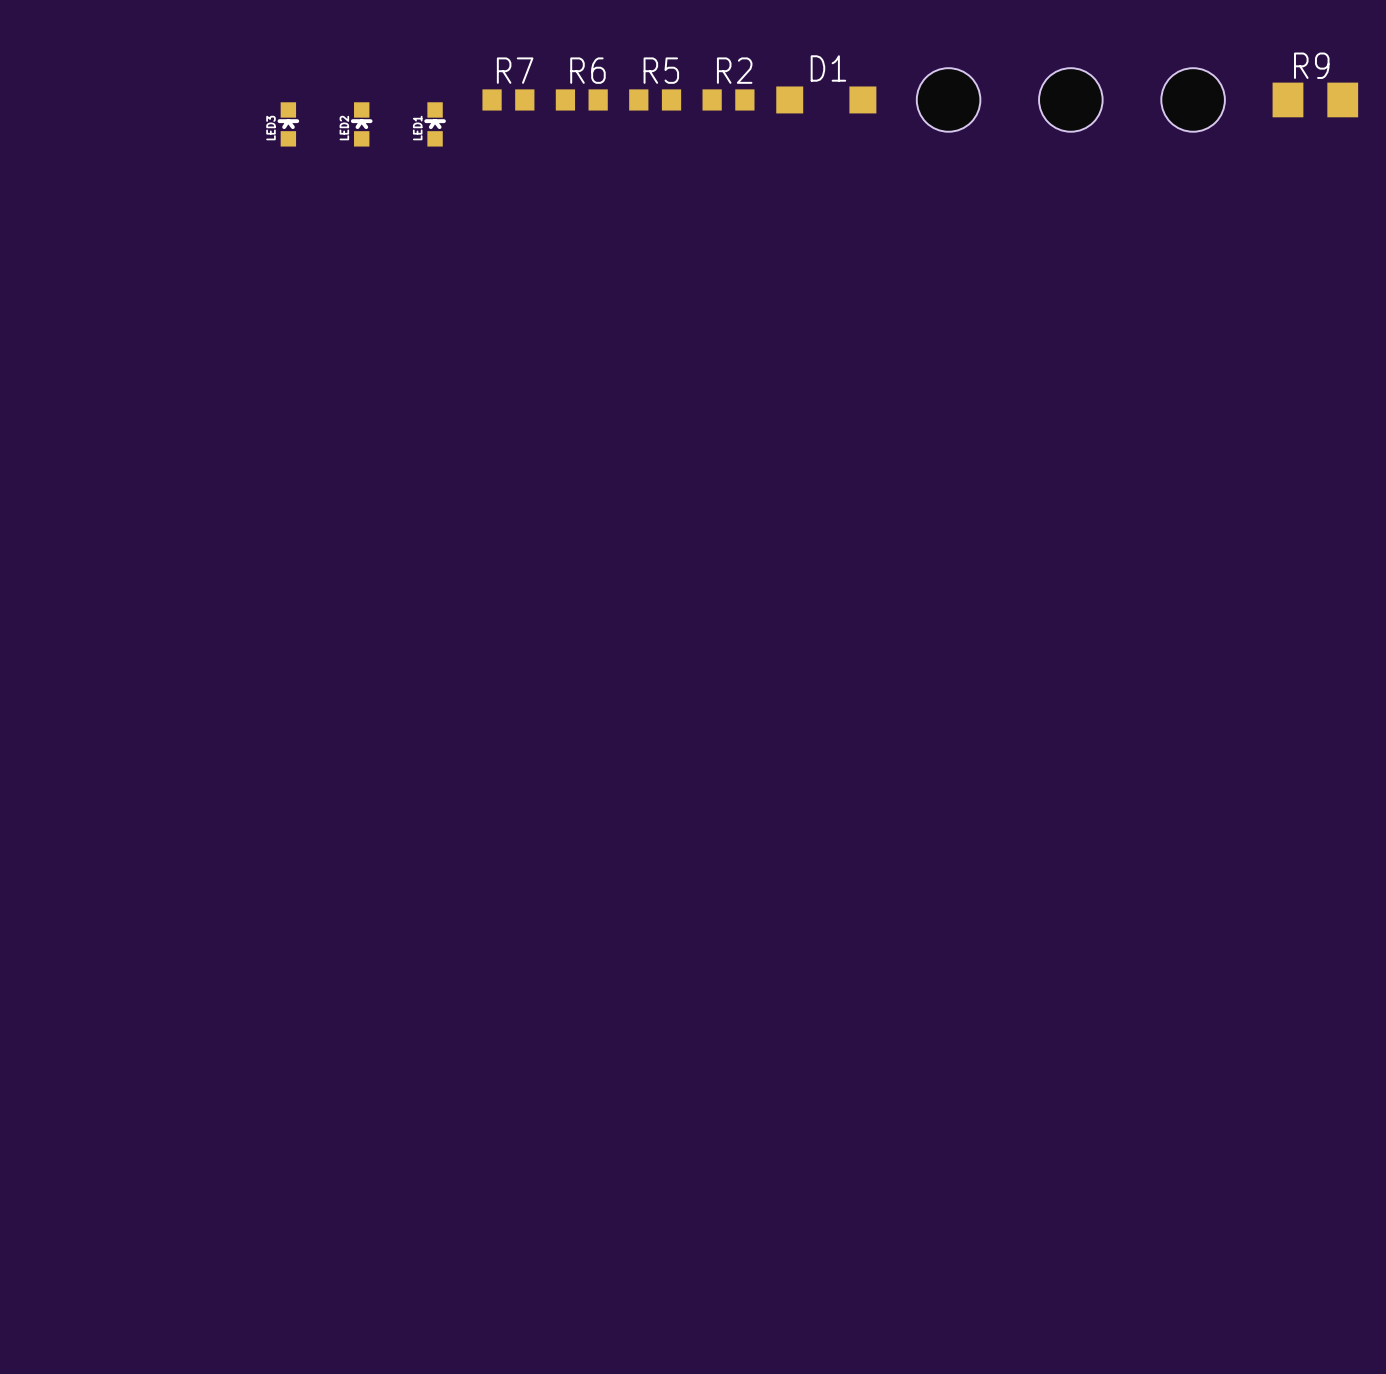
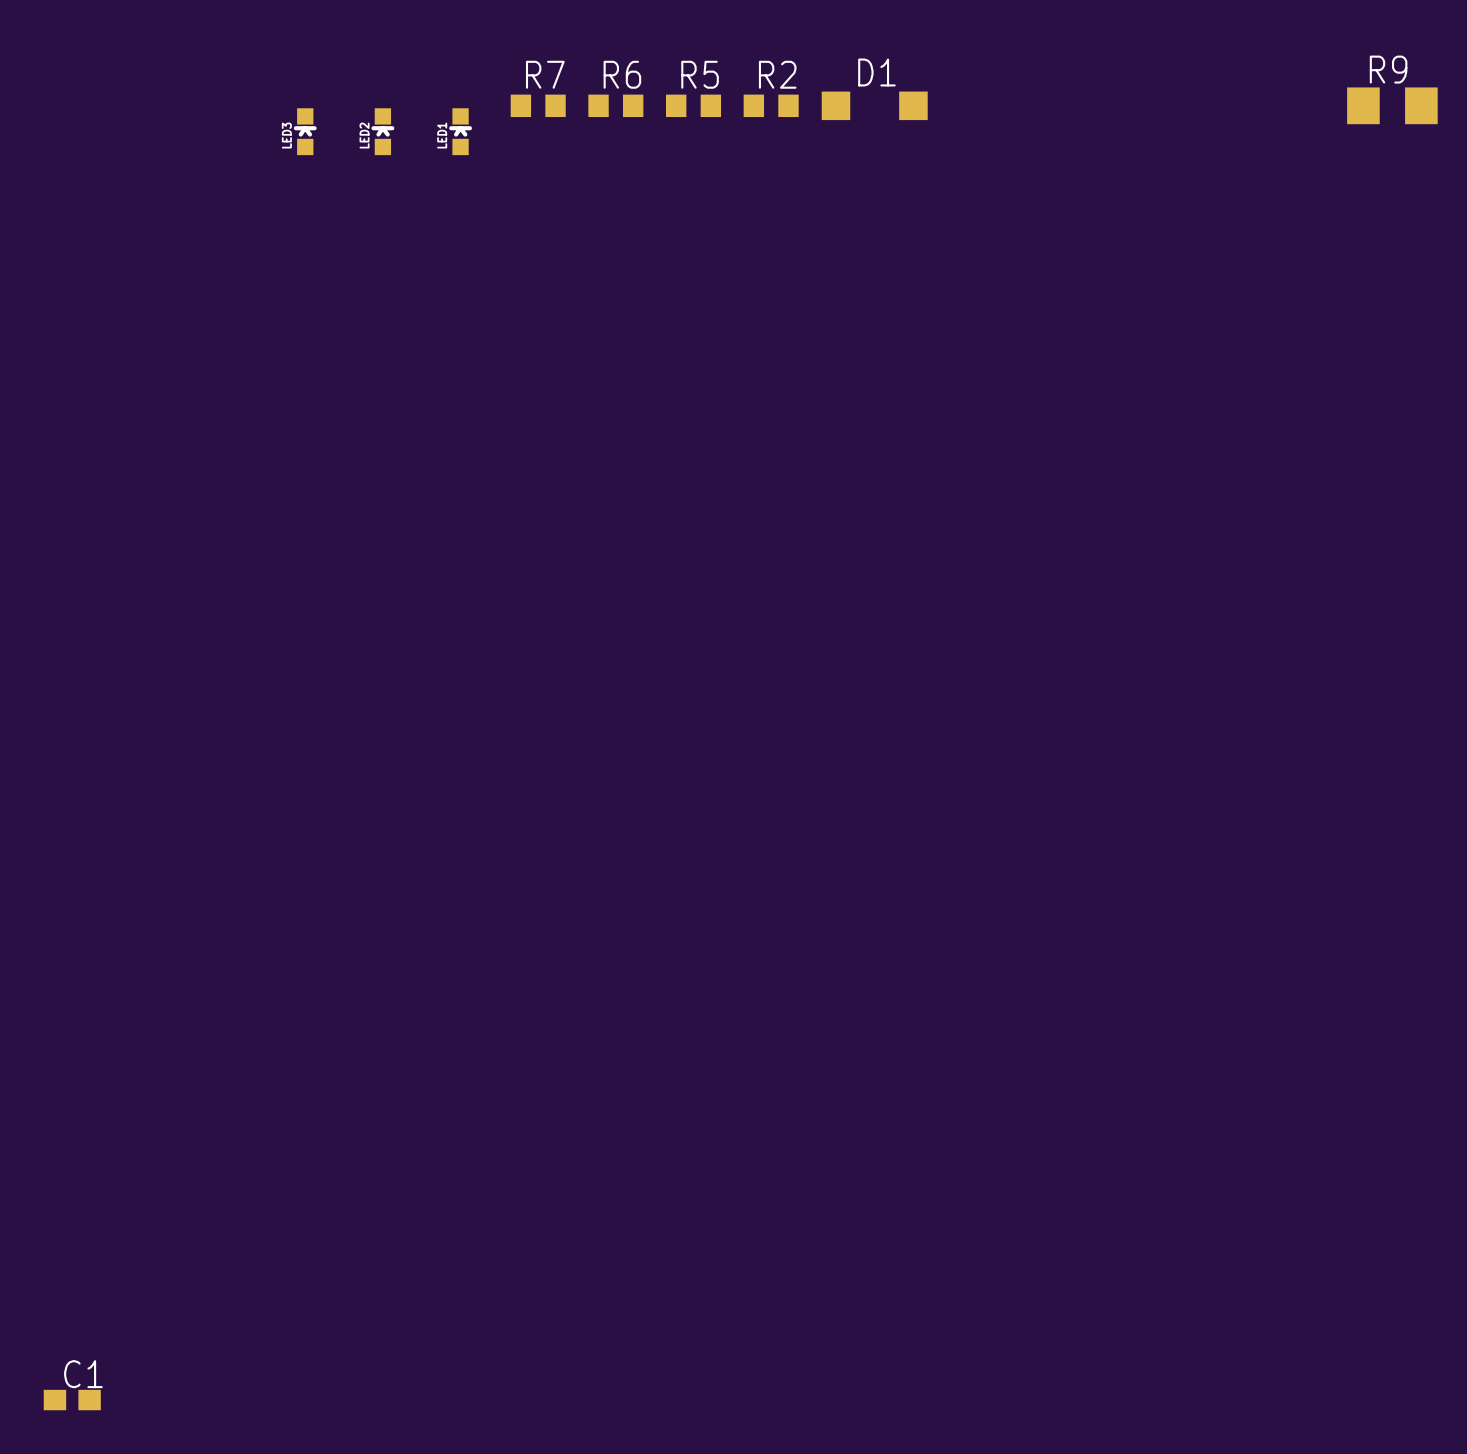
part: (948, 99) -> none
part: (1070, 99) -> none
part: (1193, 99) -> none
C1: none -> (72, 1400)

